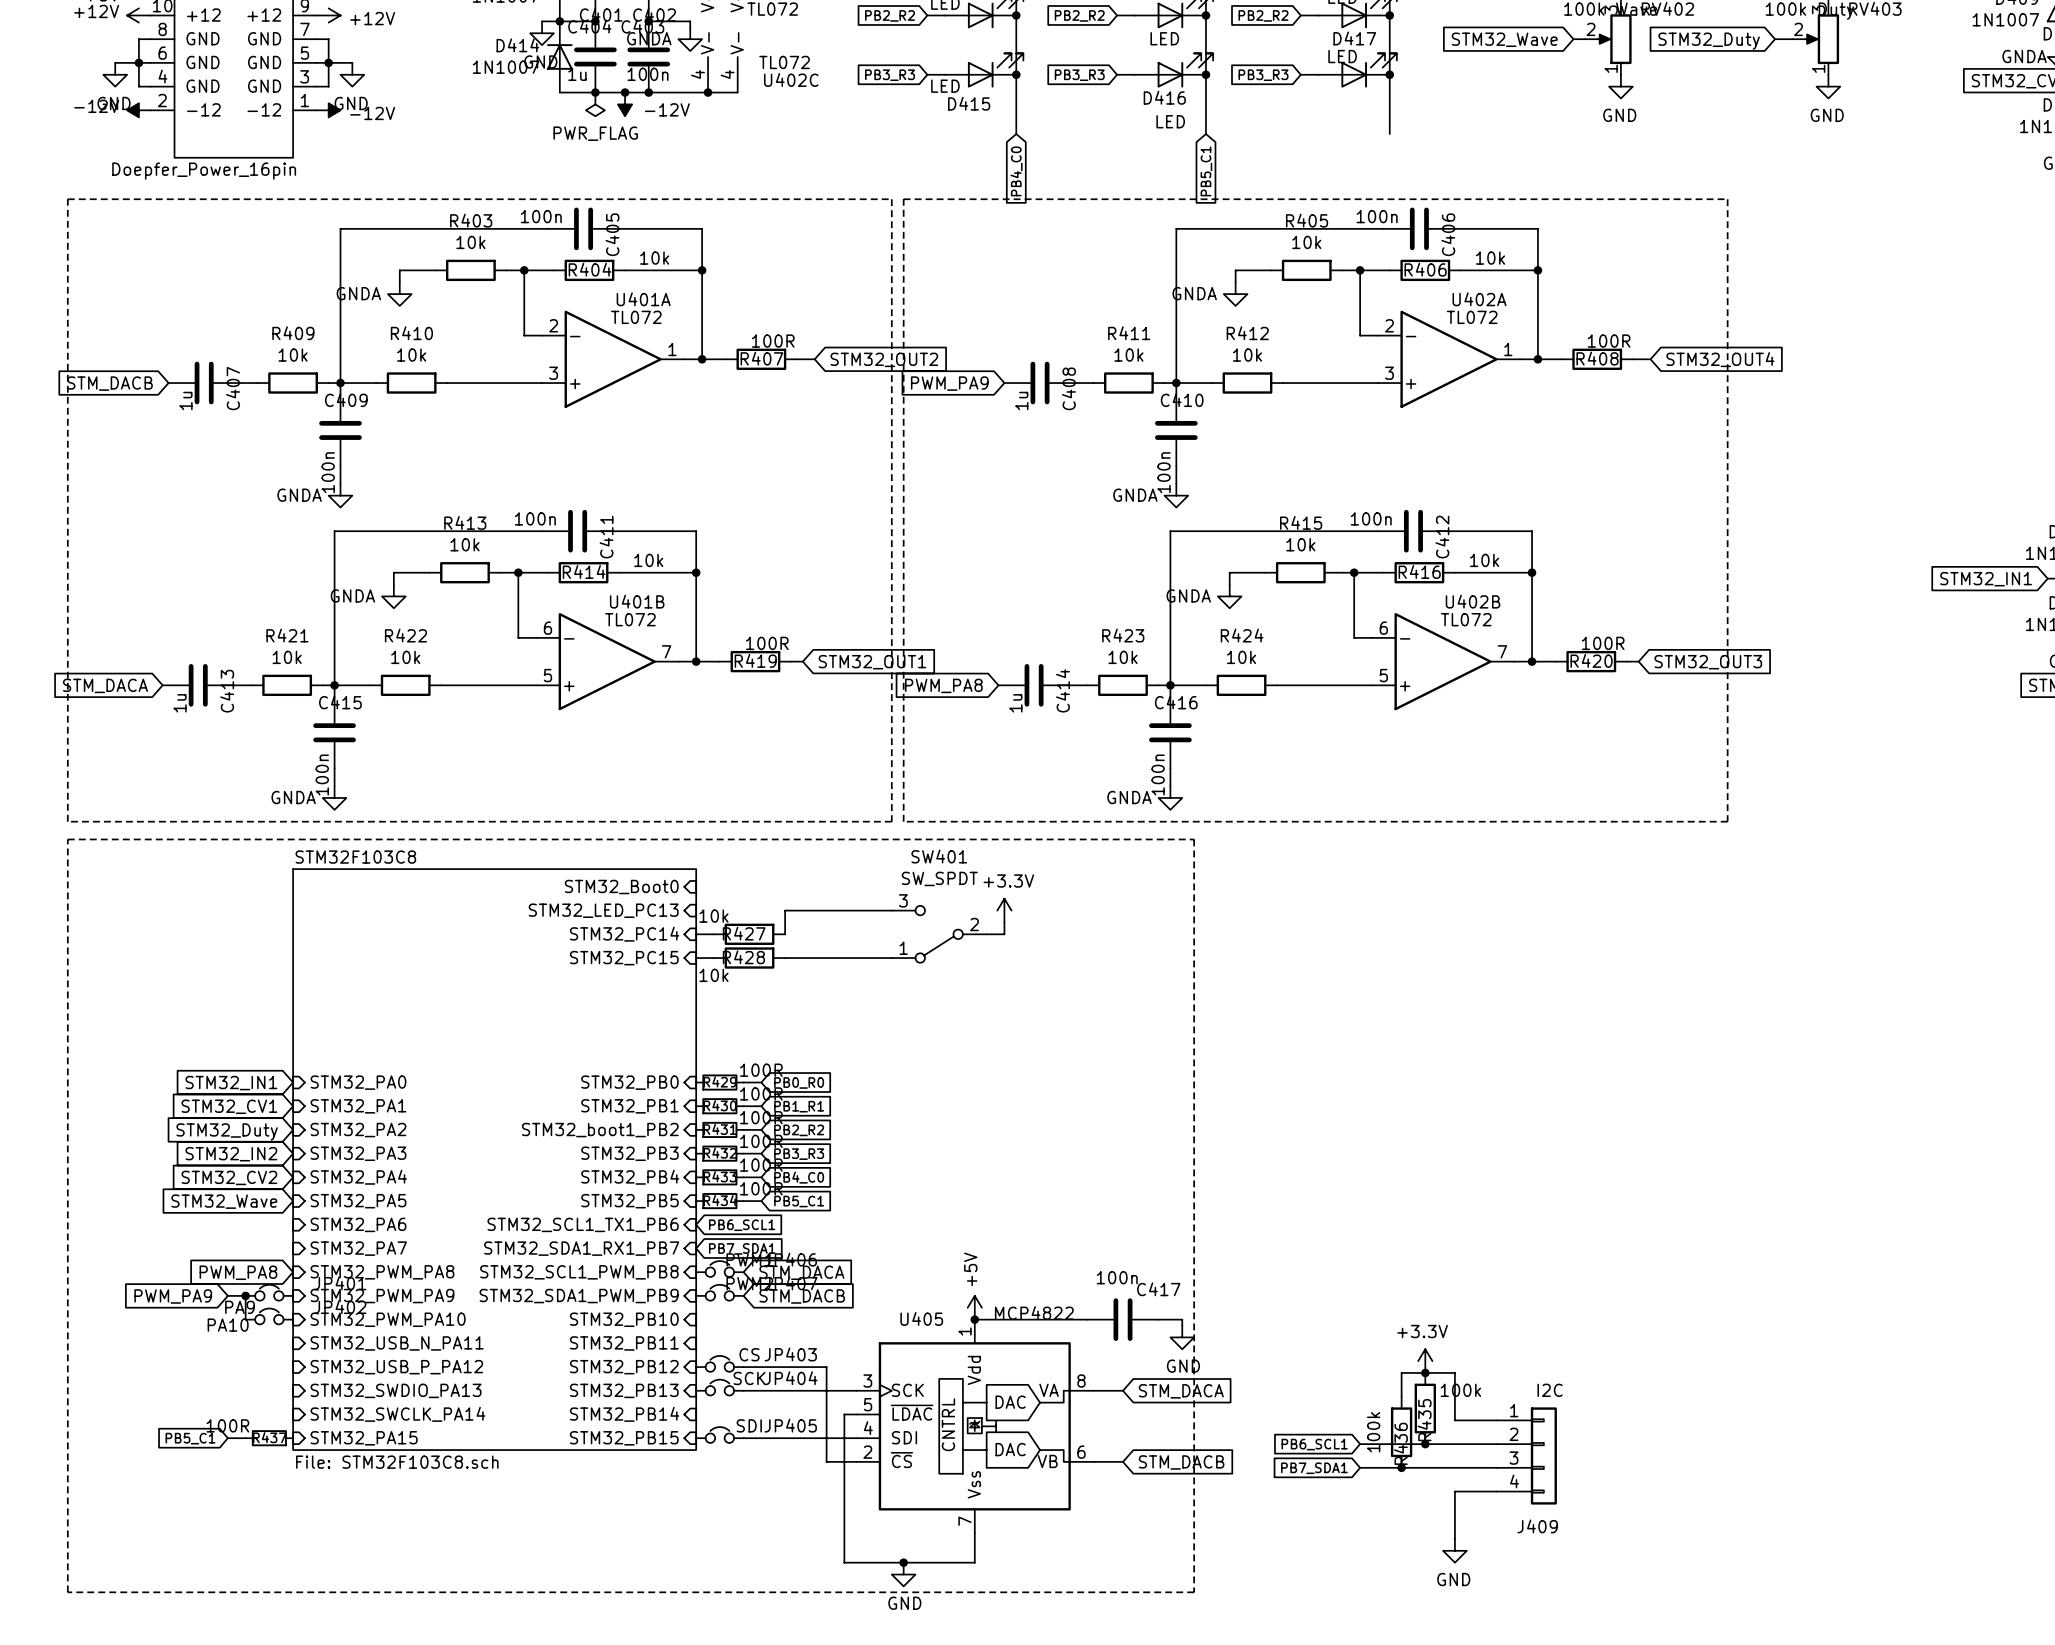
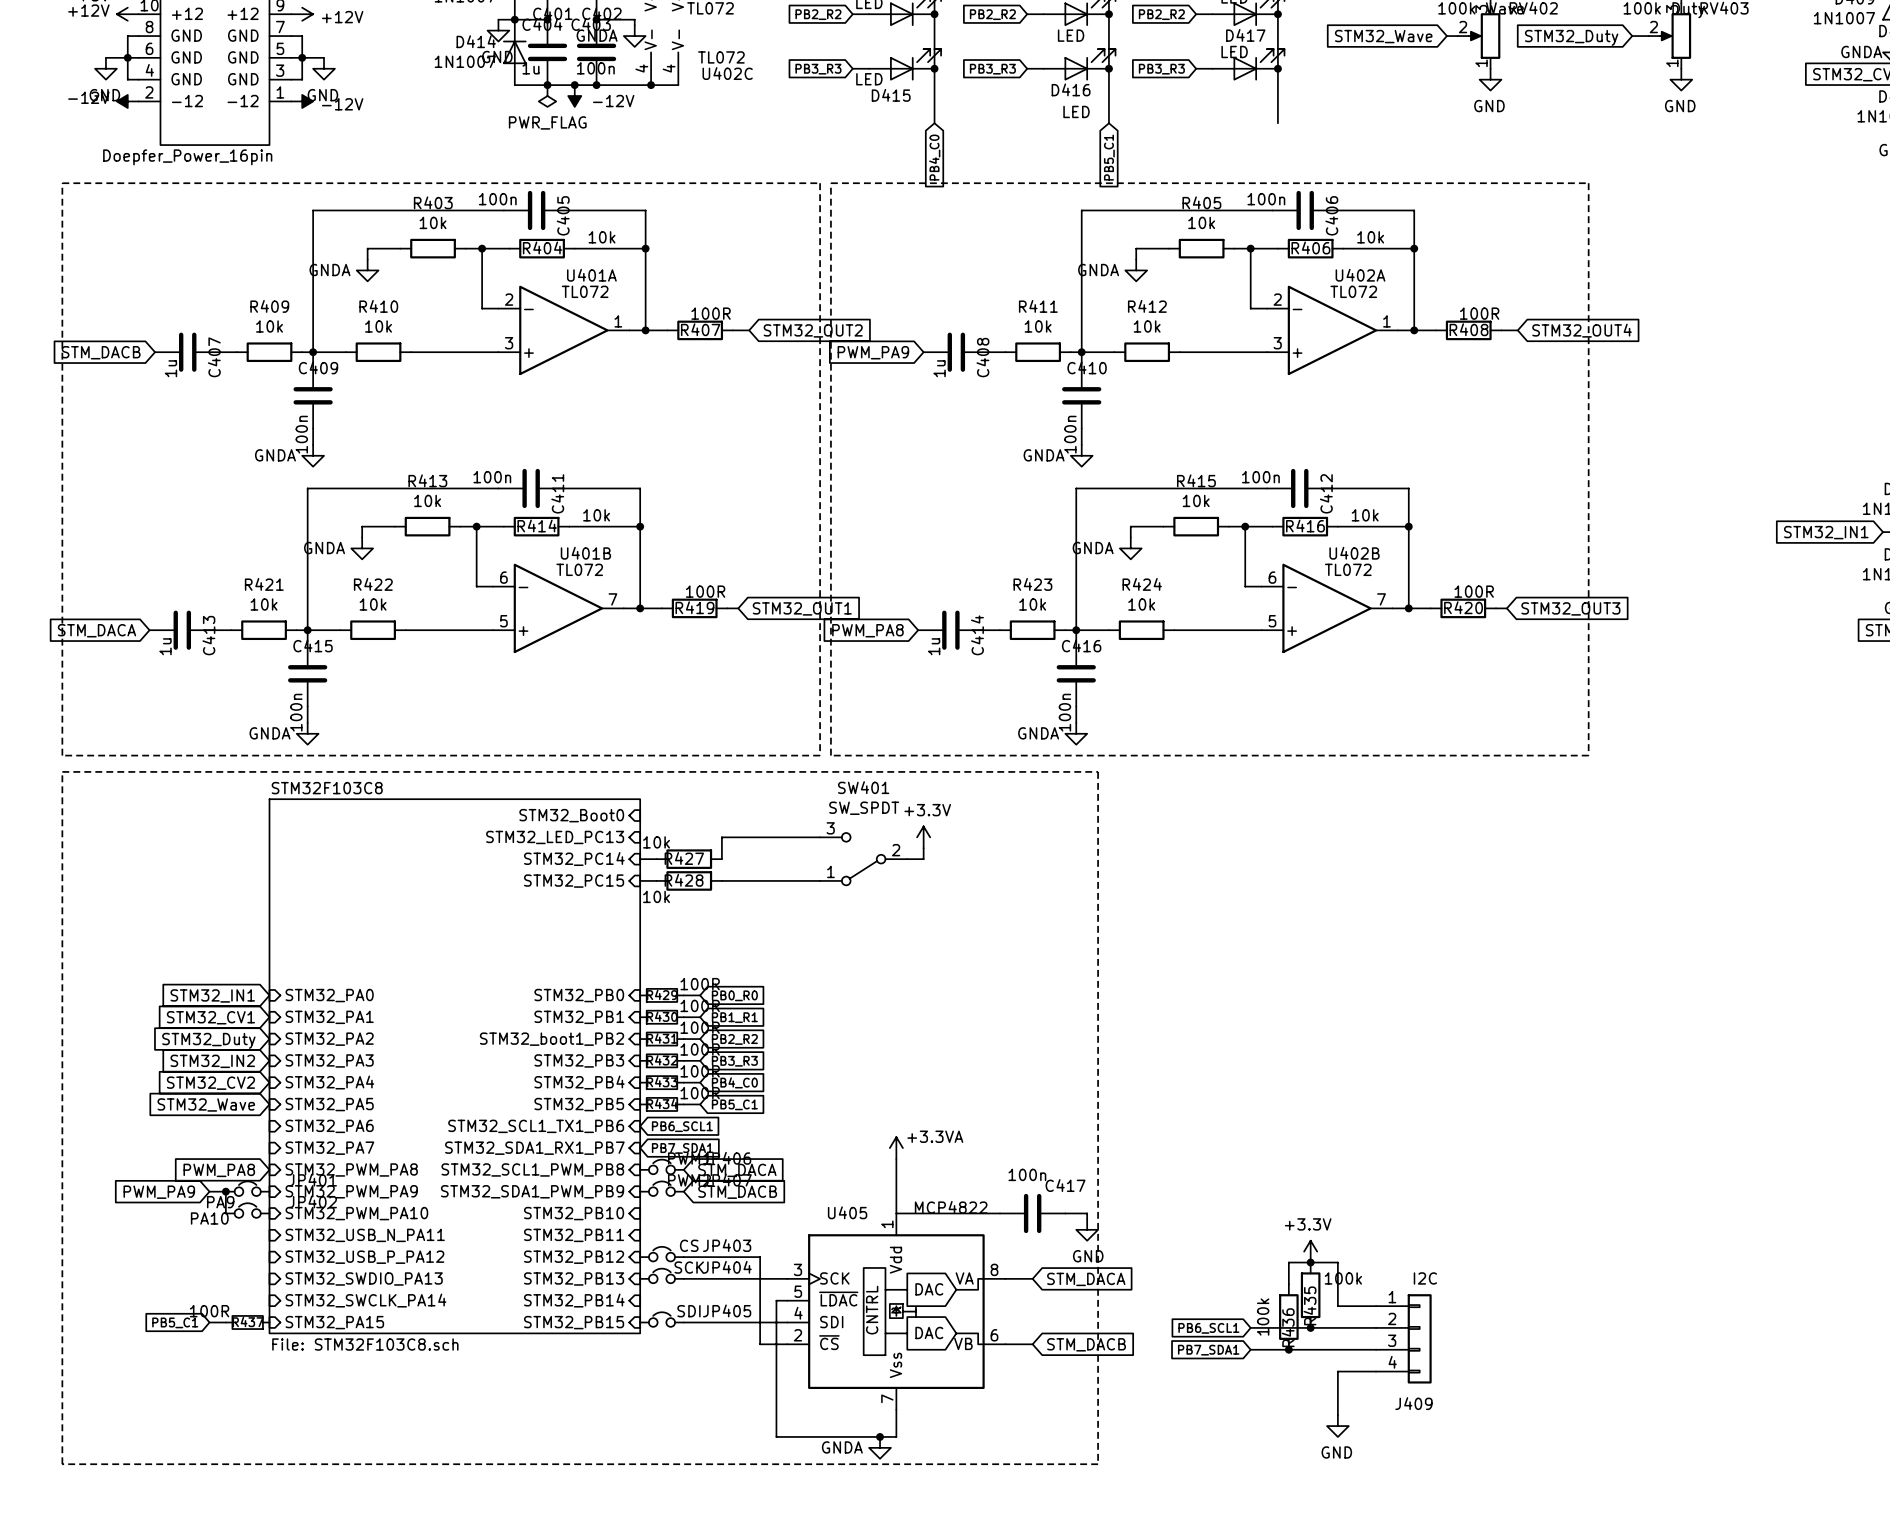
power symbol: none -> +3.3VA (896, 1148)
wire: none -> (896, 1158) (896, 1213)
power symbol: +5V (974, 1307) -> none
junction: (974, 1319) -> none
junction position: (903, 1562) -> (880, 1436)
power symbol: GND (903, 1574) -> none
power symbol: none -> GNDA (880, 1447)

